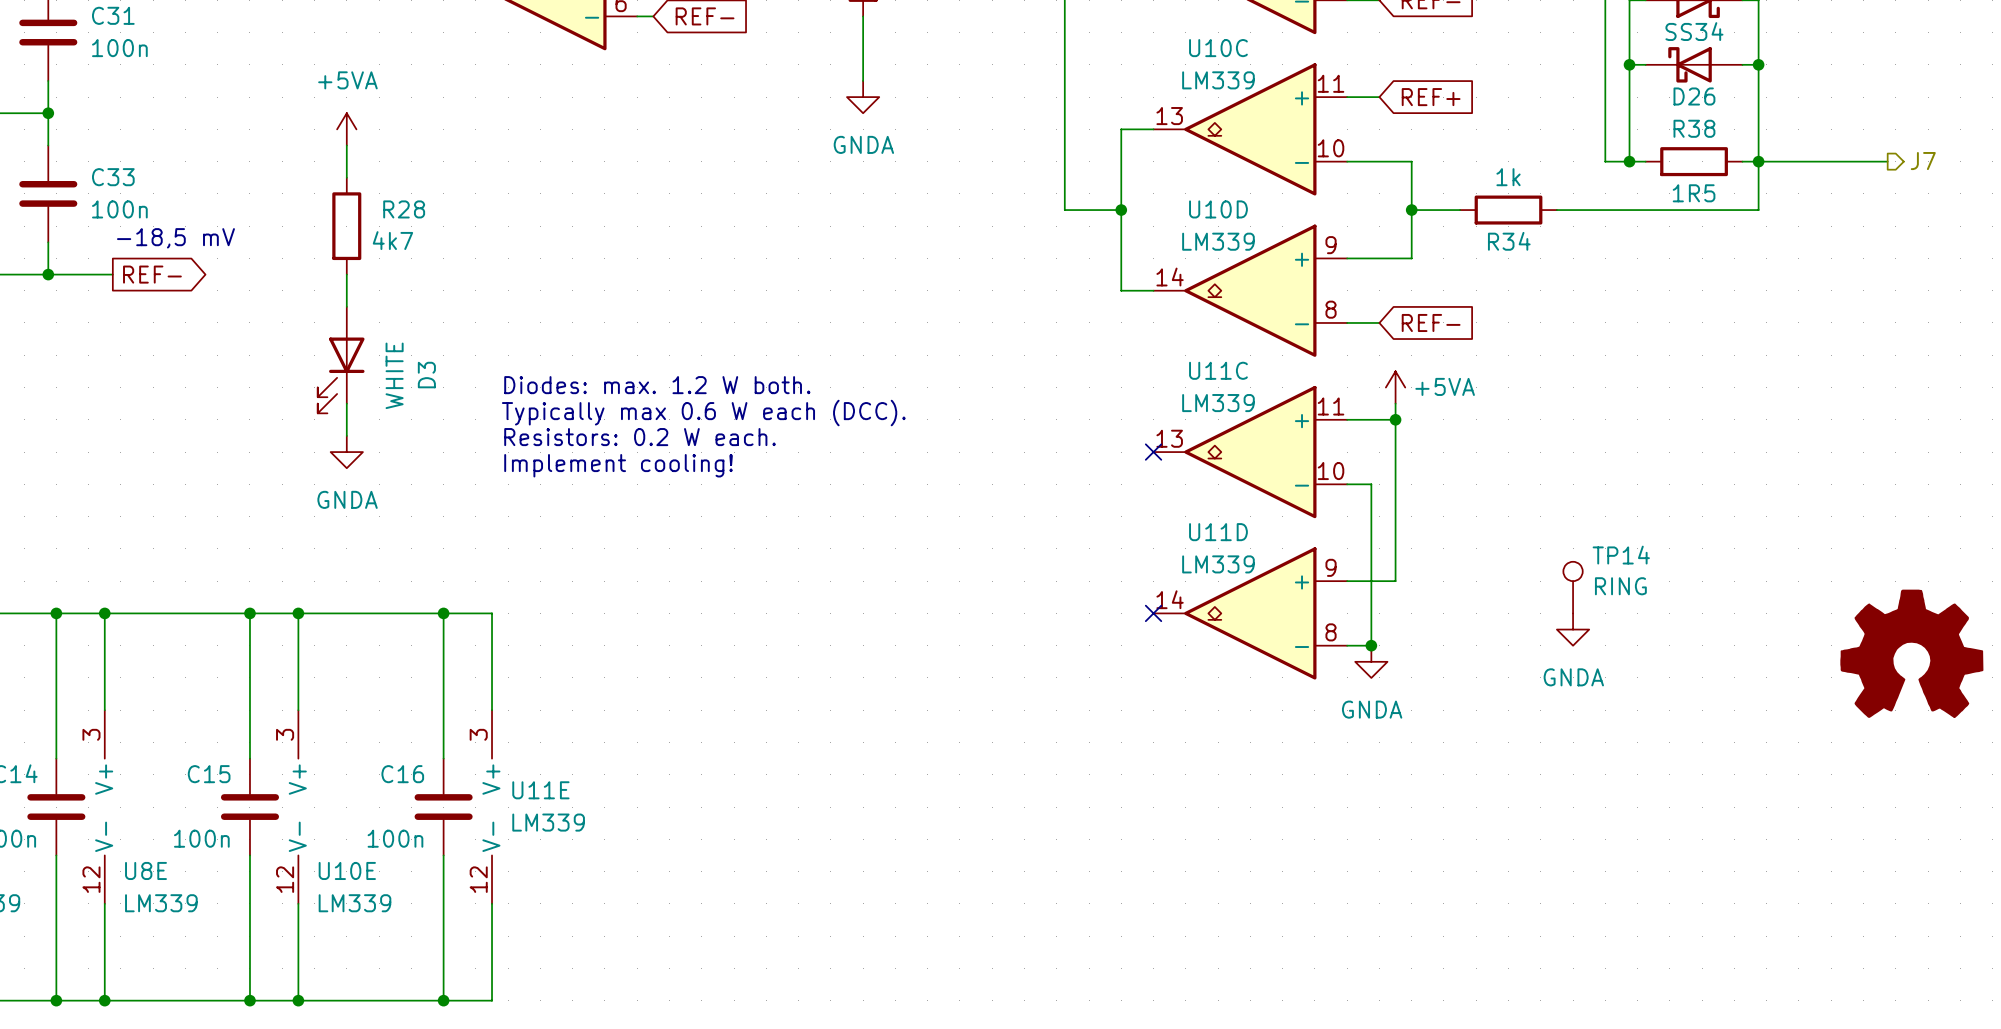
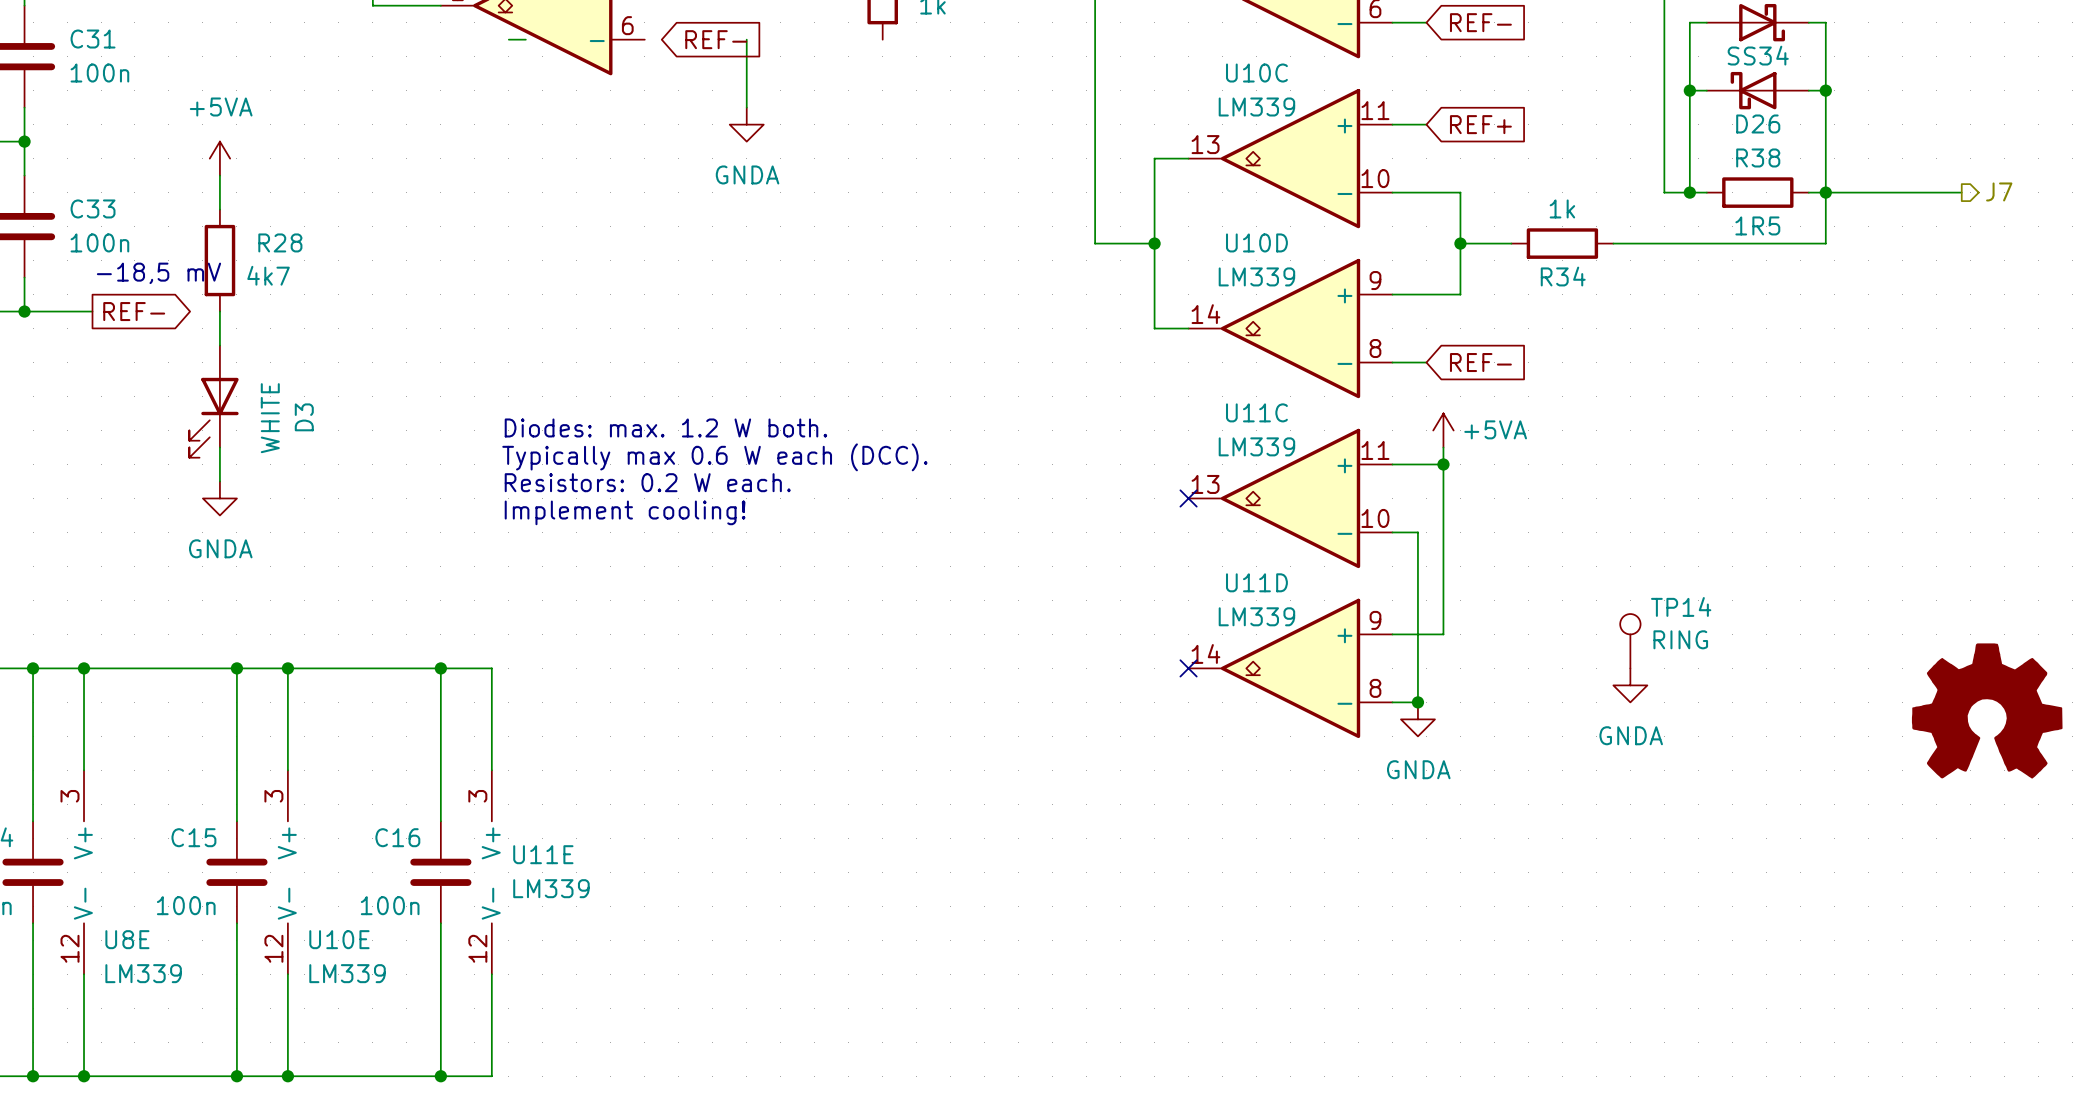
wire: (637, 16) (653, 16) -> (508, 39) (525, 39)
wire: (863, 16) (863, 80) -> (746, 39) (746, 107)
power symbol position: GNDA (863, 97) -> GNDA (746, 124)
power symbol position: +5VA (346, 129) -> +5VA (219, 158)
wire: (346, 145) (346, 177) -> (219, 175) (219, 209)
R28 position: (346, 226) -> (219, 260)
wire: (346, 274) (346, 306) -> (219, 311) (219, 345)
D3 position: (341, 360) -> (214, 401)
wire: (346, 403) (346, 435) -> (219, 447) (219, 481)
power symbol position: GNDA (346, 452) -> GNDA (219, 498)

